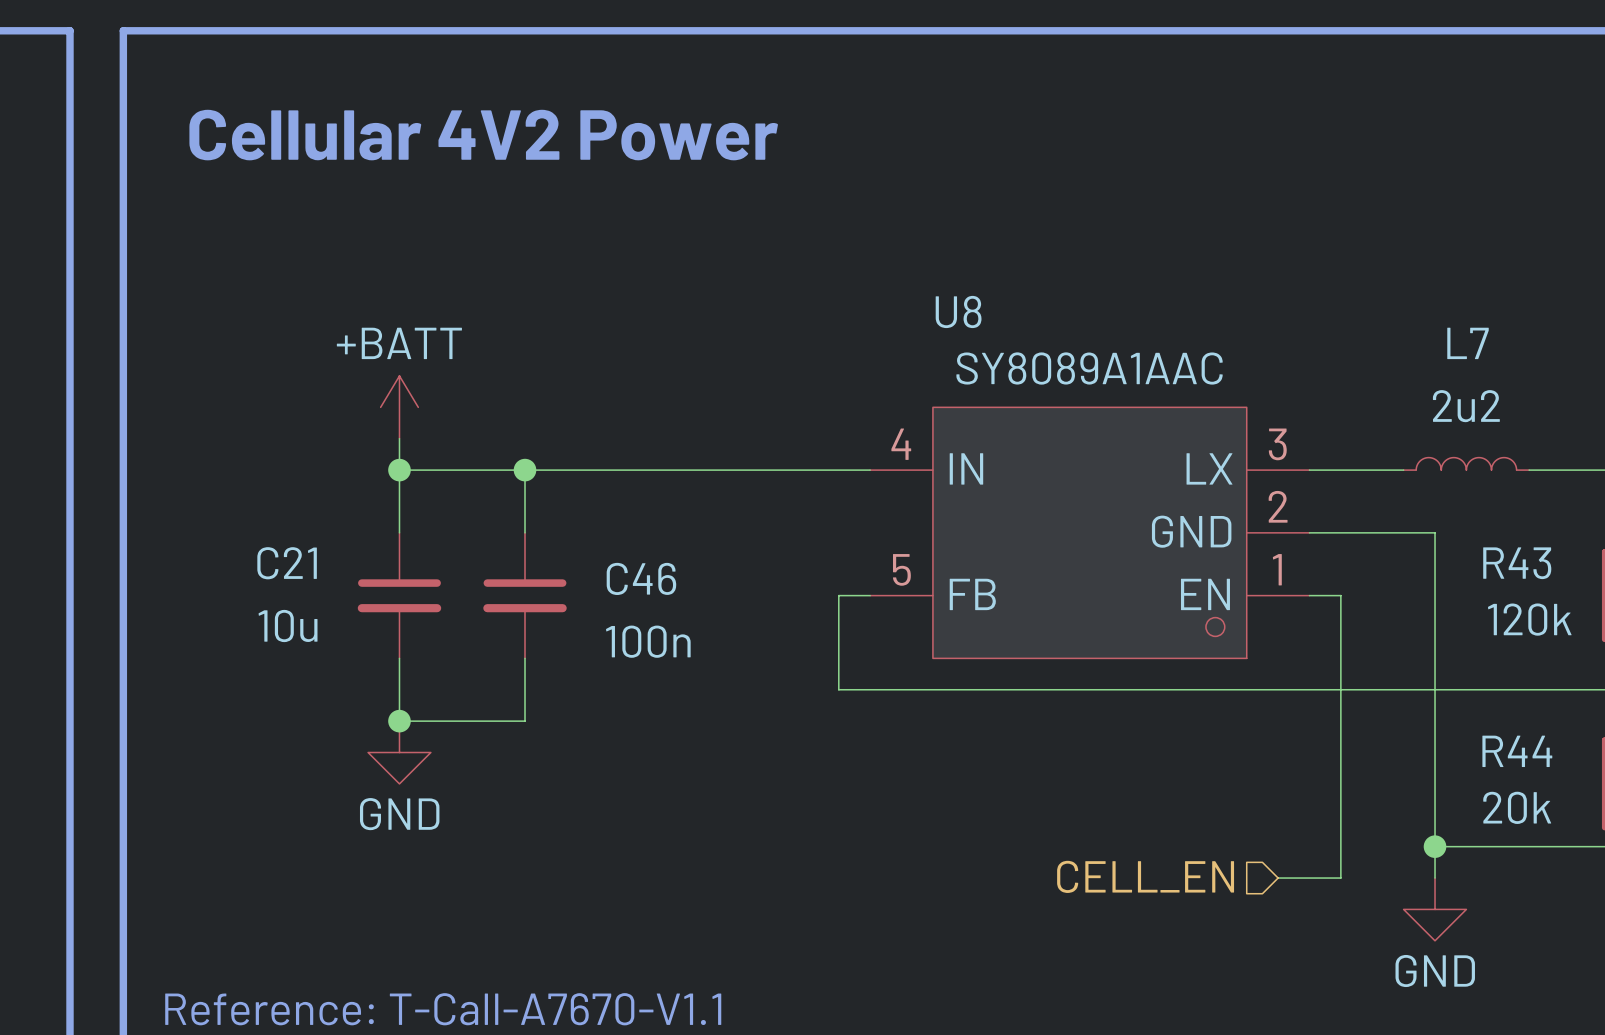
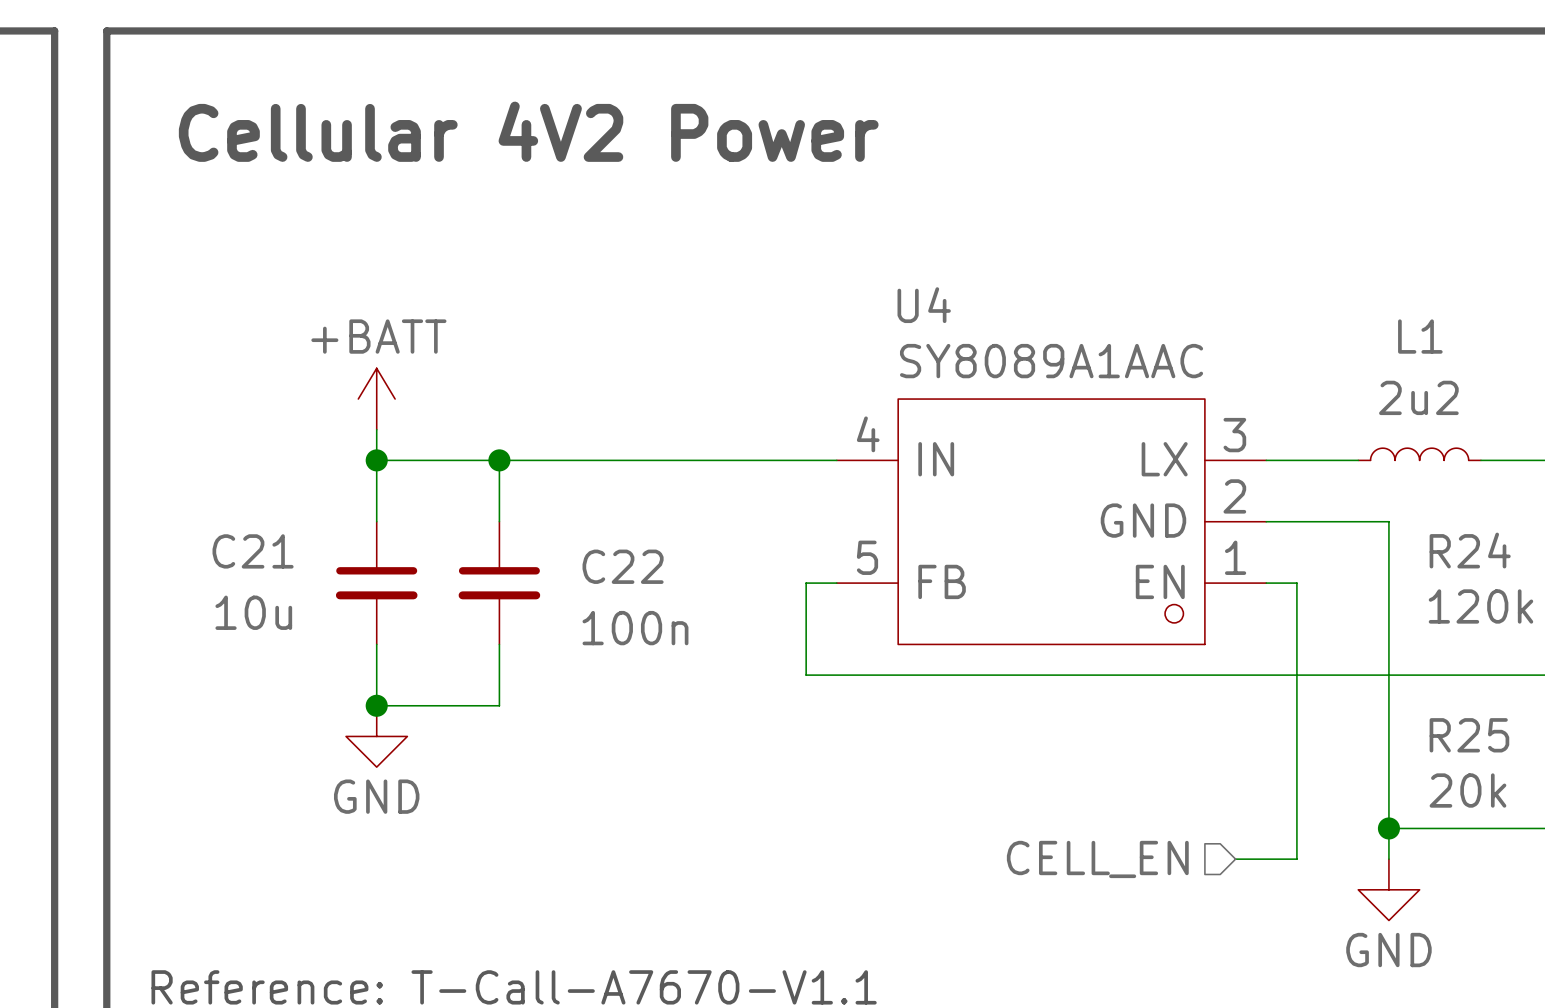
U8 name: U8 (958, 311) -> U4 (924, 305)
L7 name: L7 (1468, 343) -> L1 (1420, 336)
R43 name: R43 (1517, 563) -> R24 (1470, 550)
C46 name: C46 (641, 578) -> C22 (623, 566)
R44 name: R44 (1517, 751) -> R25 (1469, 735)

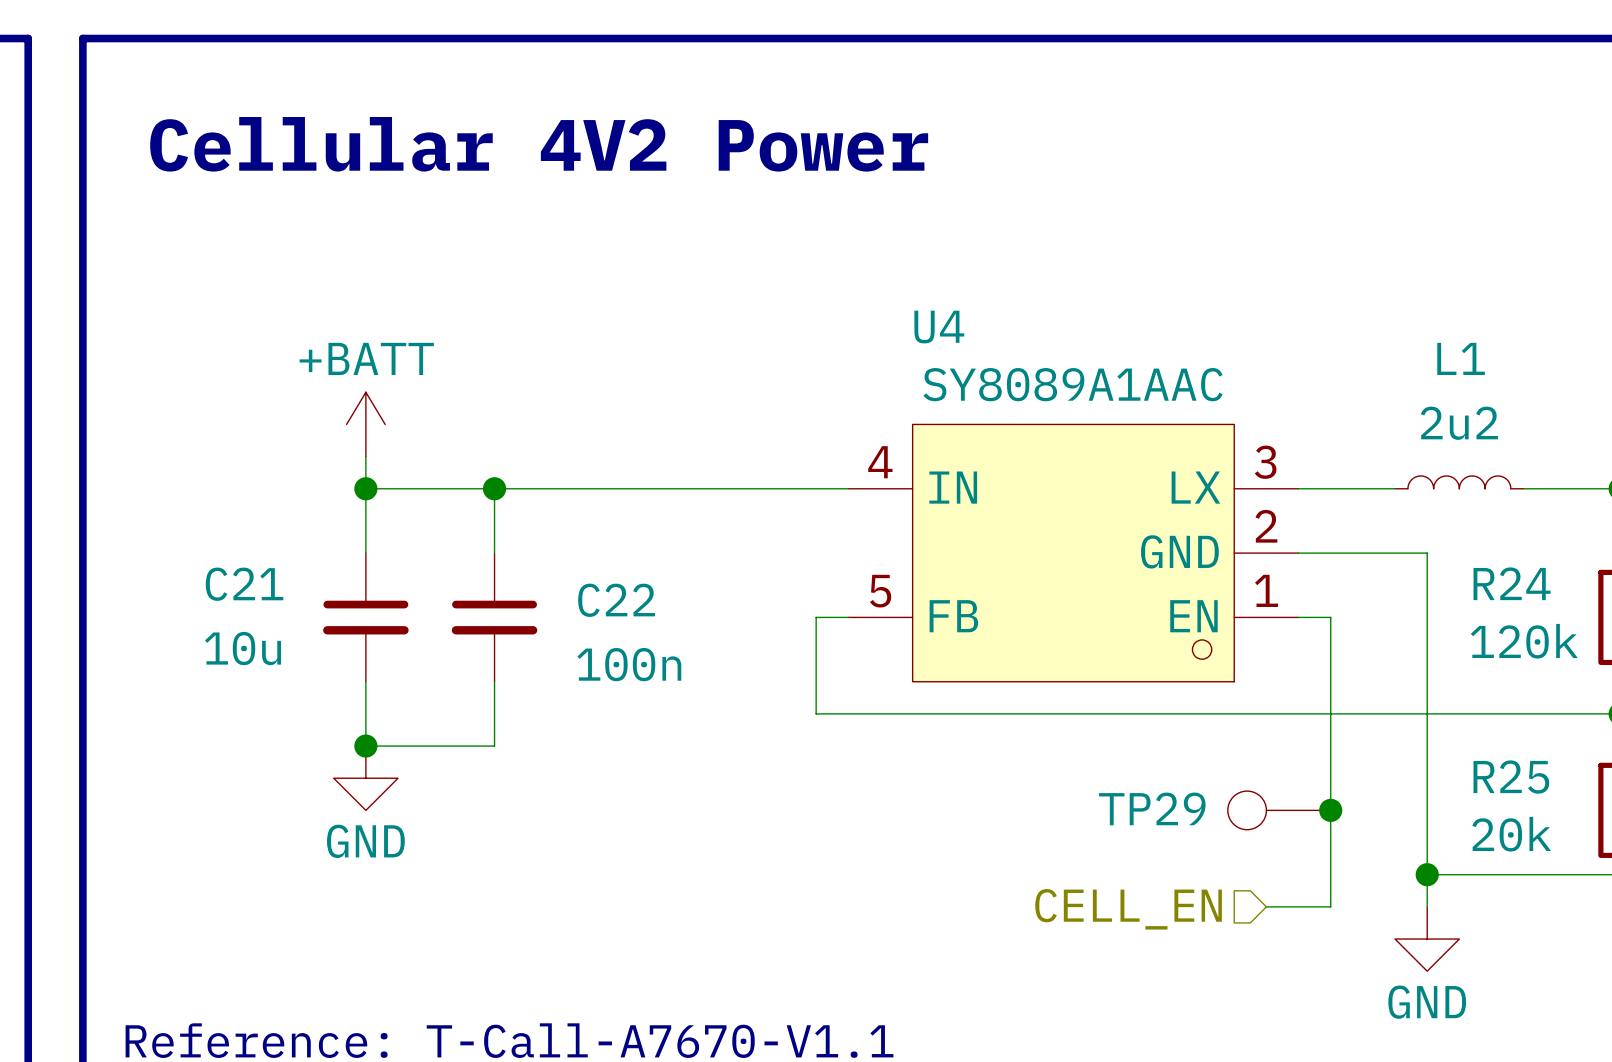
TP29: none -> (1279, 810)
junction: none -> (1330, 810)

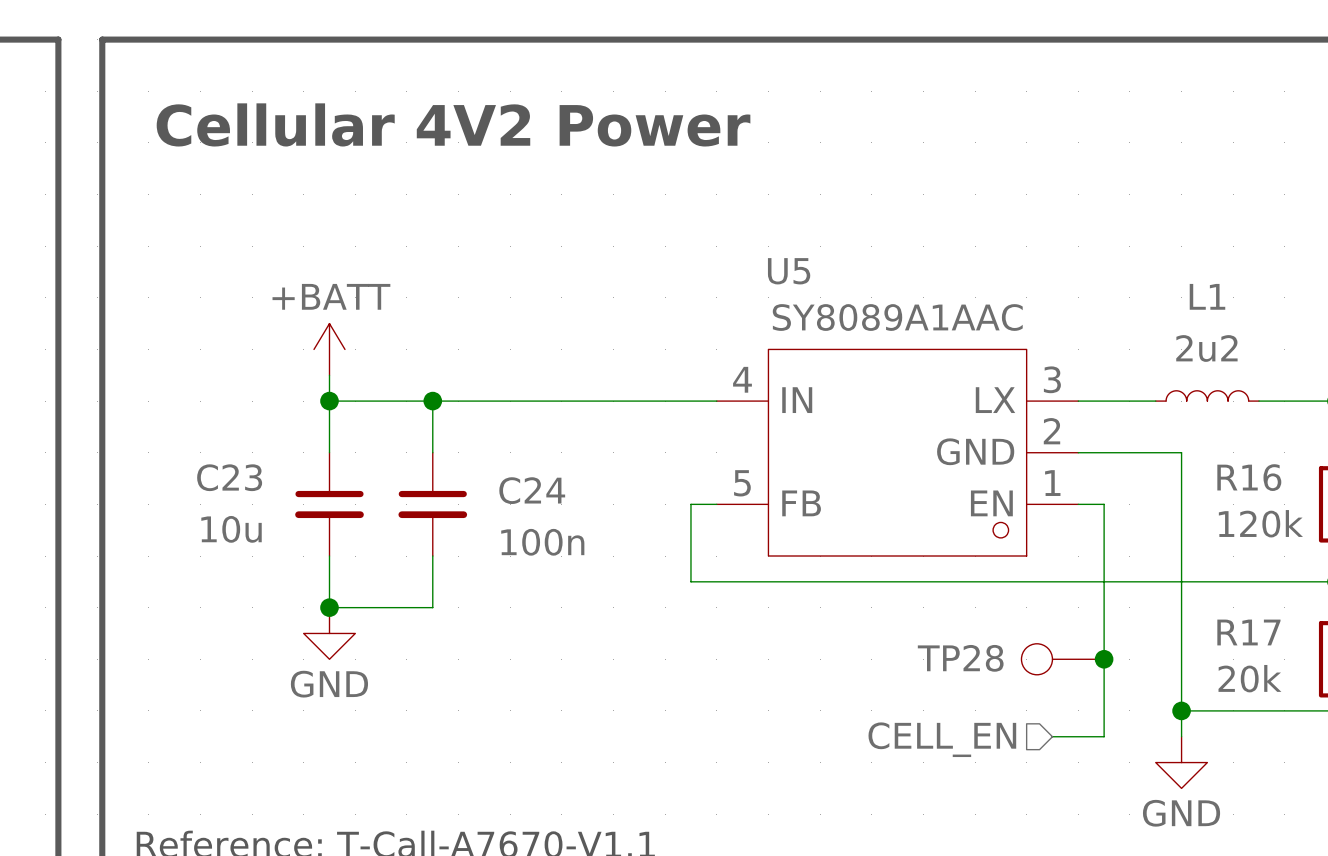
U4 name: U4 (939, 327) -> U5 (789, 271)
R24 name: R24 (1512, 583) -> R16 (1249, 477)
C21 name: C21 (244, 584) -> C23 (229, 477)
C22 name: C22 (616, 600) -> C24 (532, 490)
R25 name: R25 (1511, 777) -> R17 (1248, 632)
TP29 name: TP29 (1152, 808) -> TP28 (960, 658)

